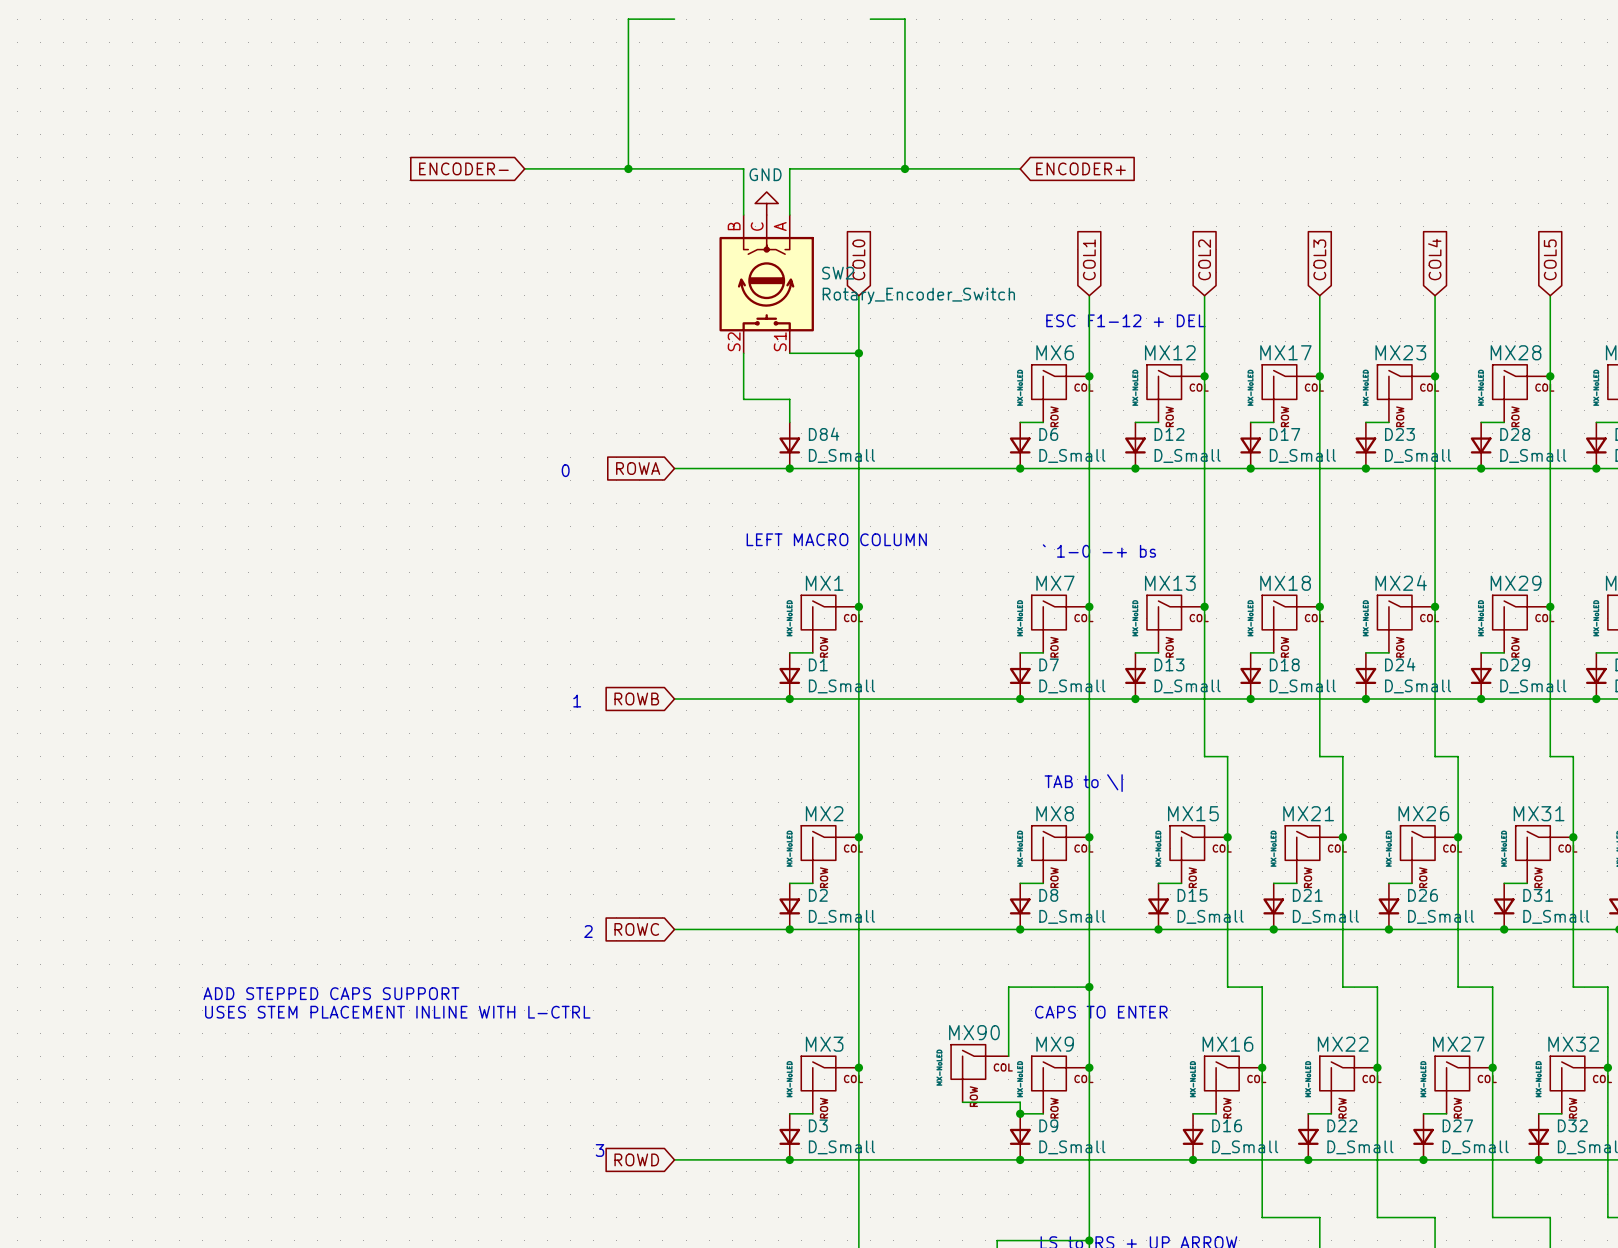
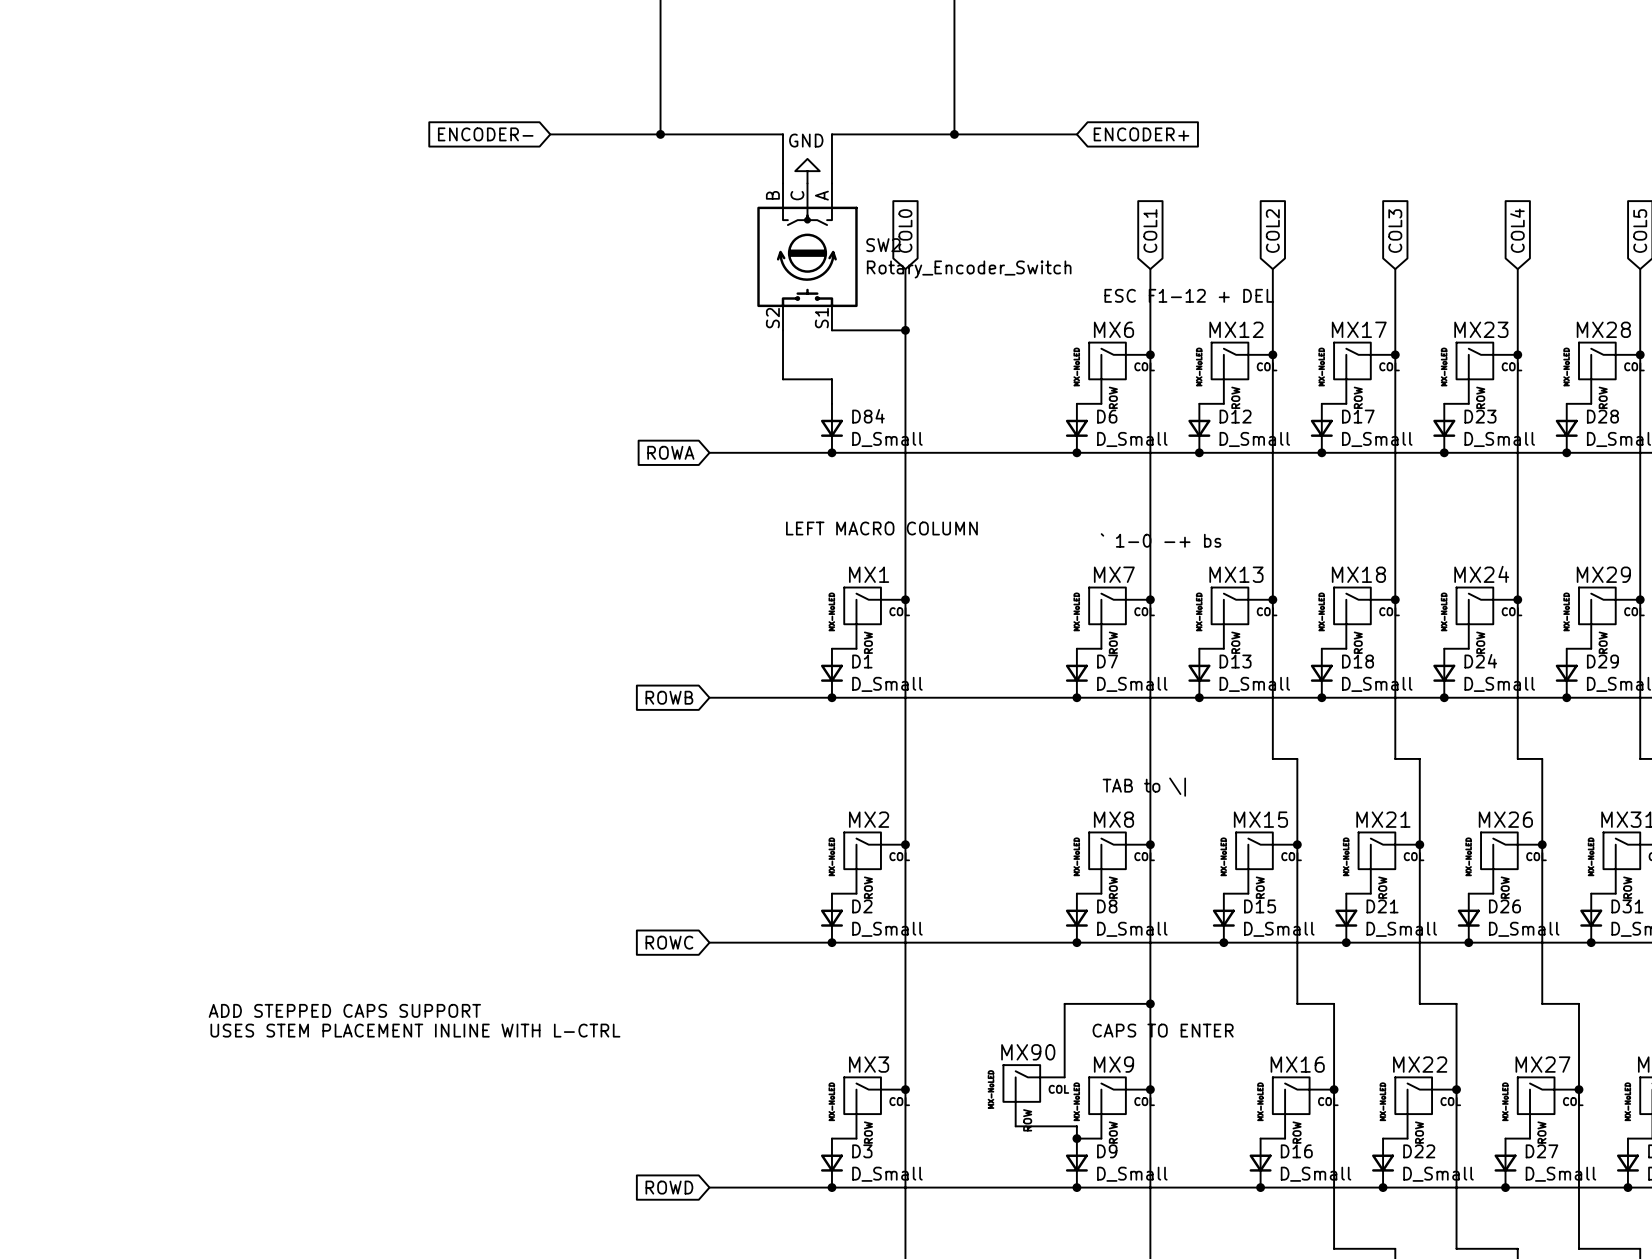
text: 0 (565, 470) -> none
text: 1 (577, 701) -> none
text: 2 (588, 931) -> none
text: 3 (599, 1150) -> none

